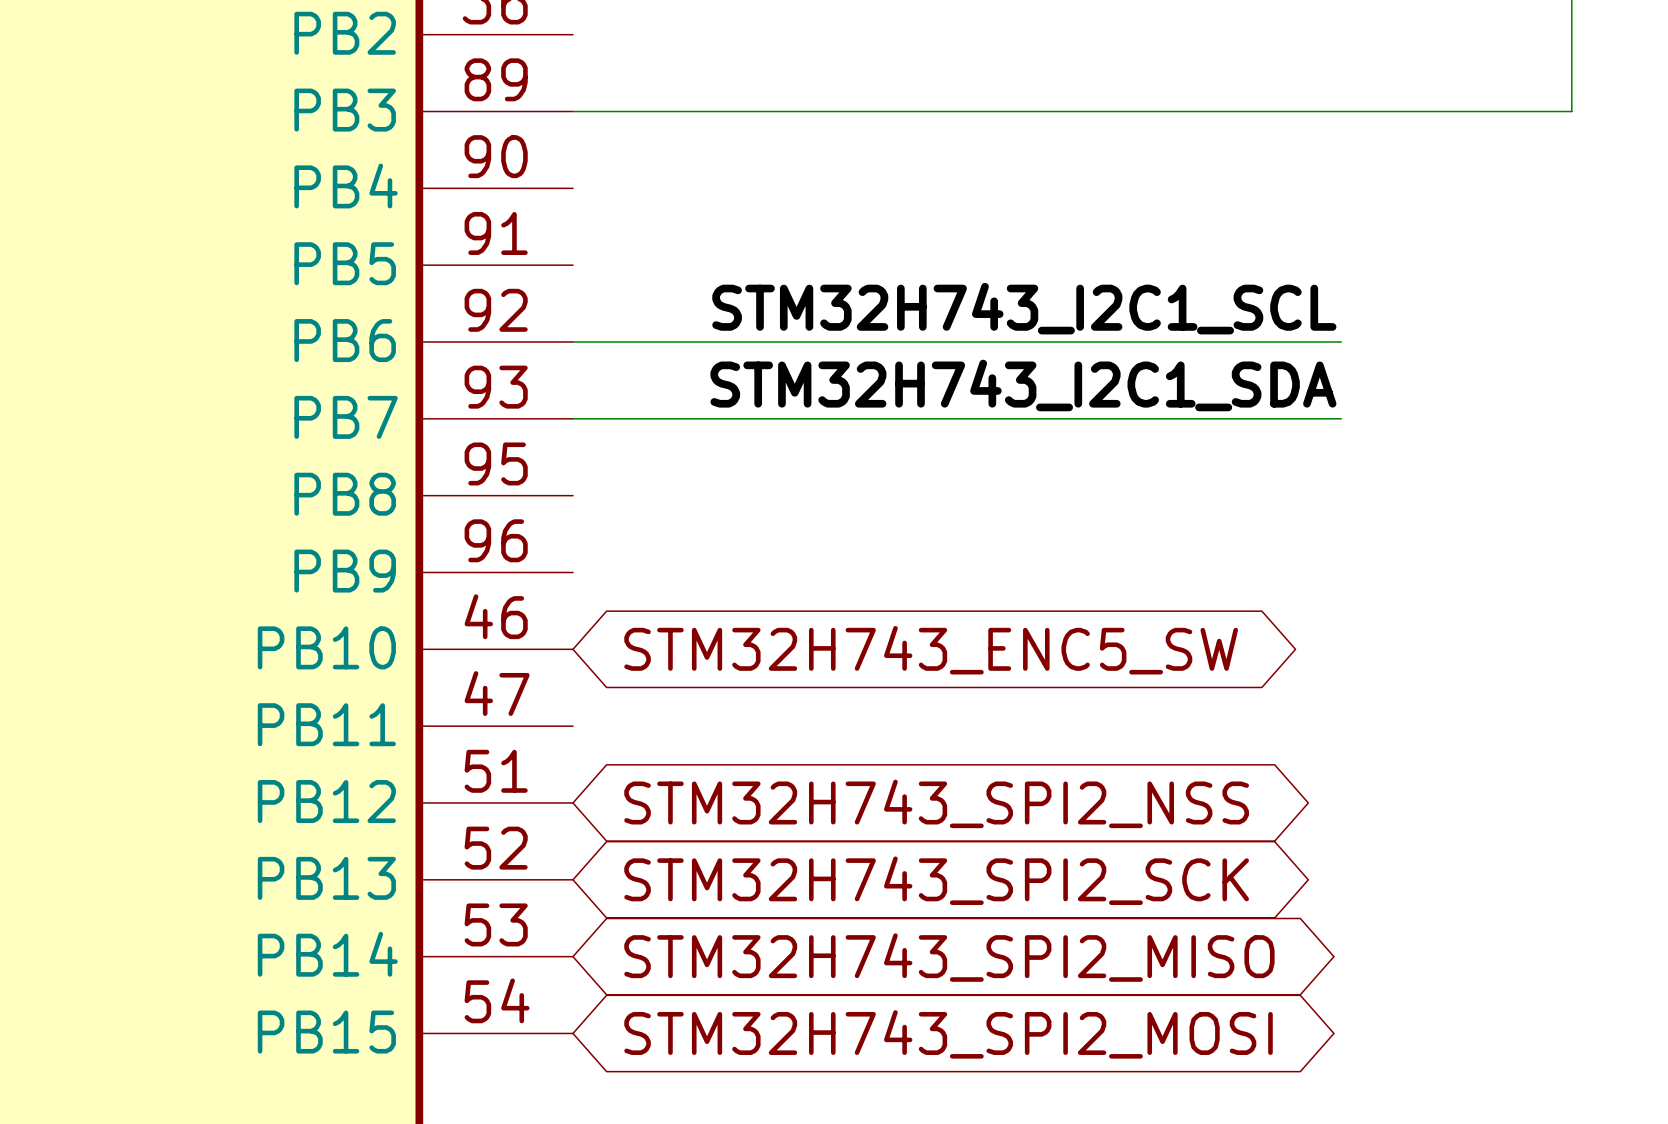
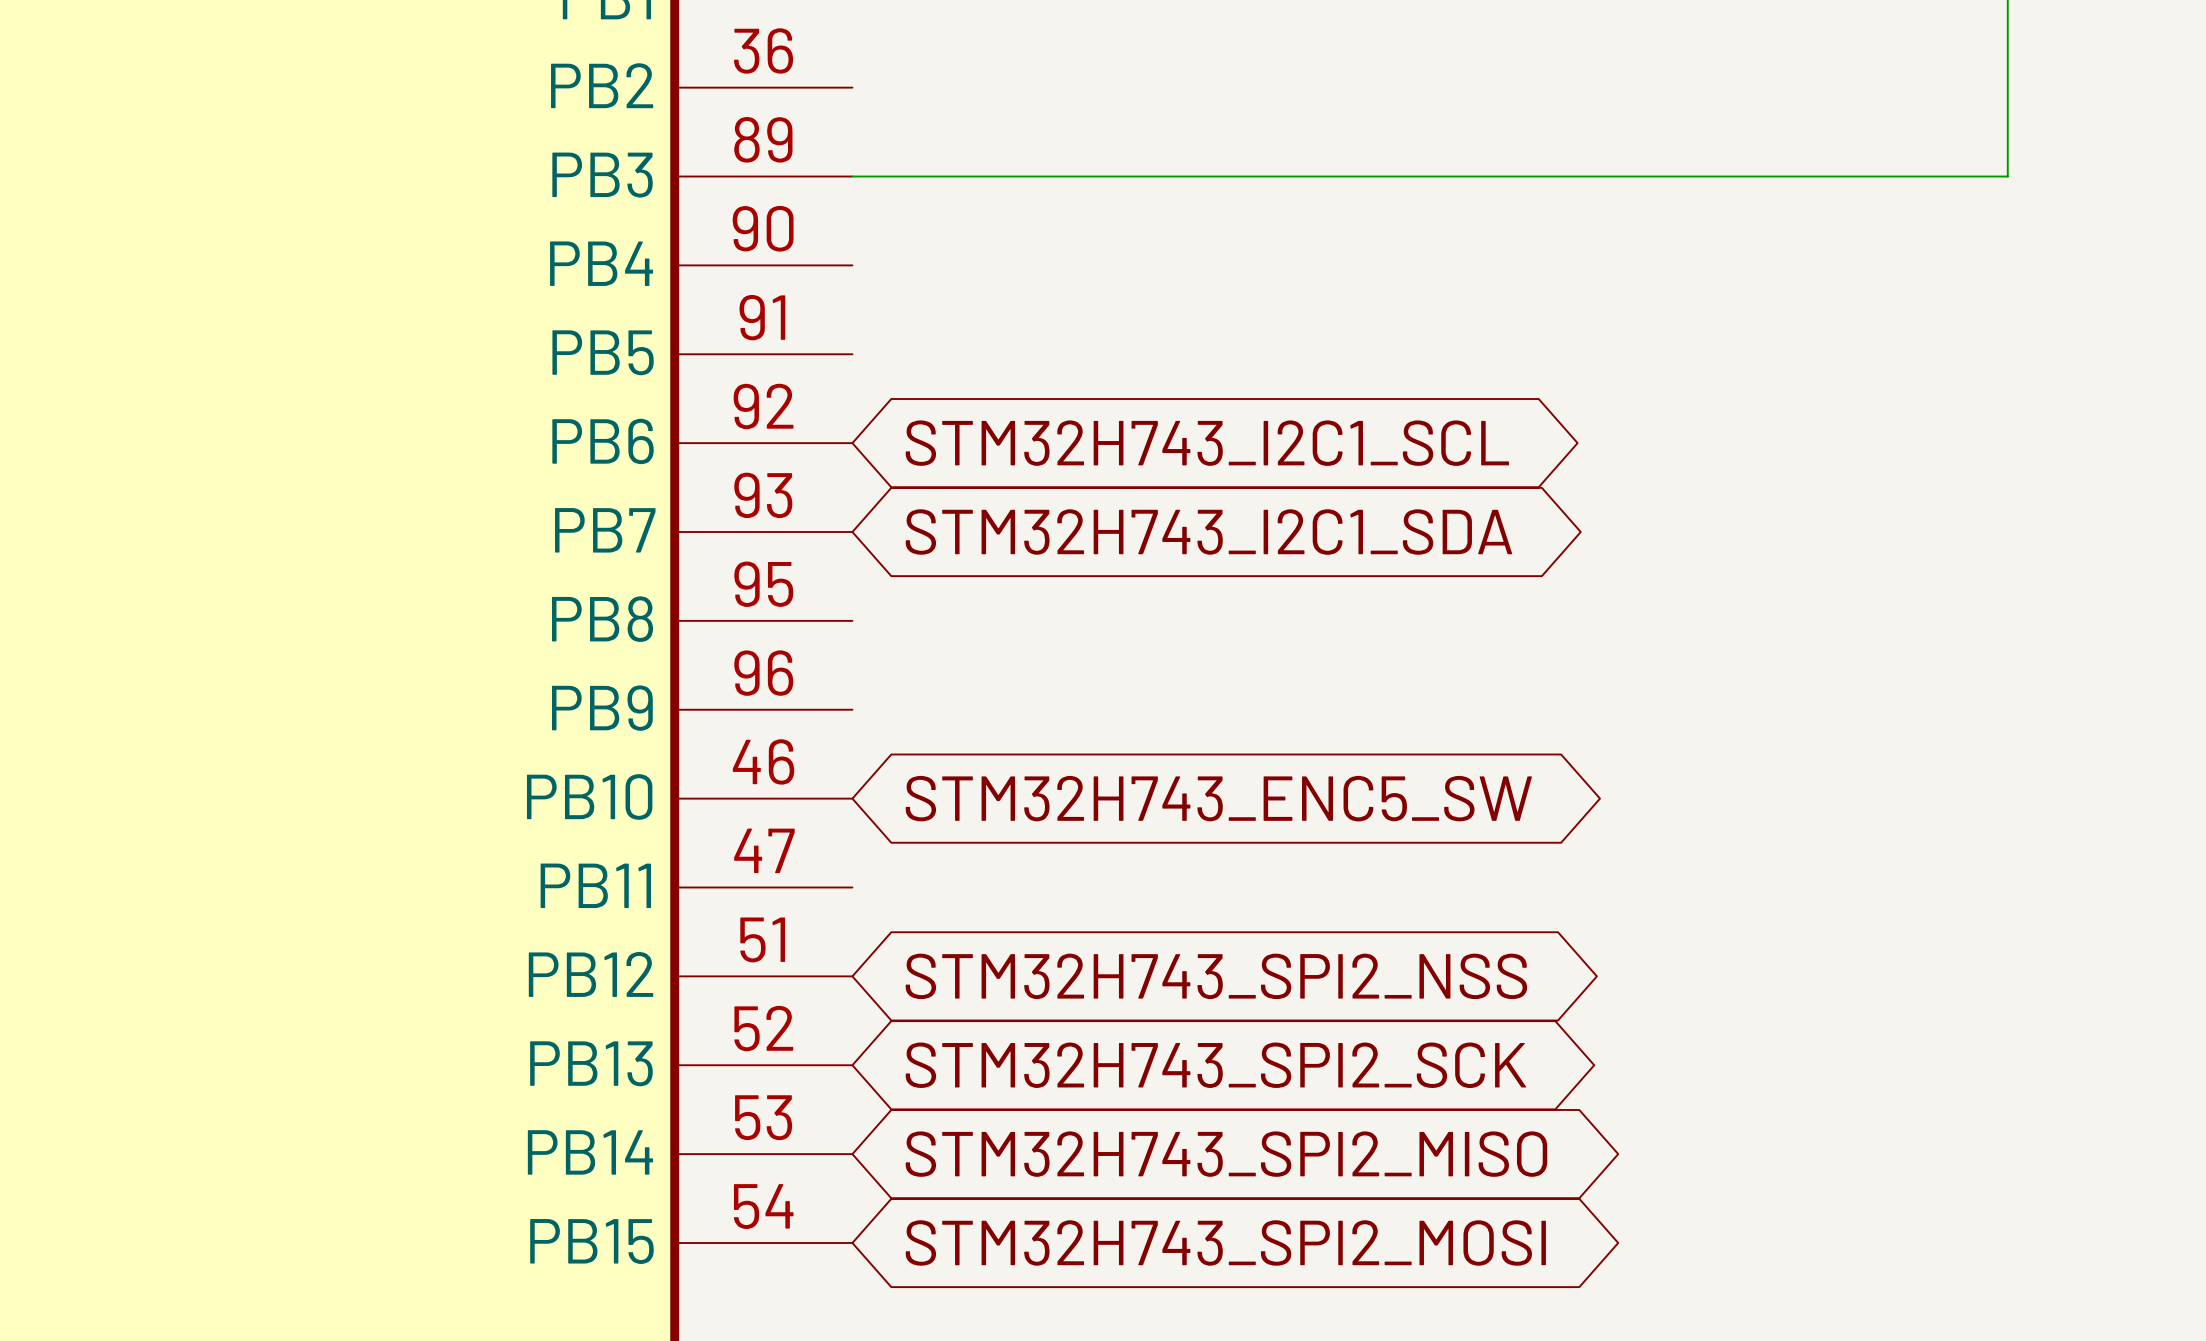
label: STM32H743_I2C1_SCL (1024, 308) -> none
wire: (572, 342) (1341, 342) -> none
global label: none -> STM32H743_I2C1_SCL (1207, 443)
label: STM32H743_I2C1_SDA (1023, 385) -> none
wire: (572, 418) (1341, 418) -> none
global label: none -> STM32H743_I2C1_SDA (1208, 532)

